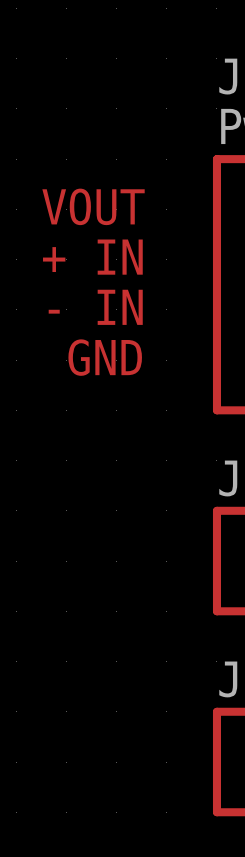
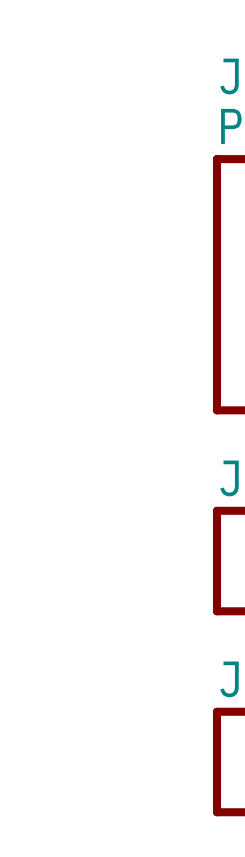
text: VOUT (93, 206) -> none
text: + IN (92, 257) -> none
text: - IN (95, 307) -> none
text: GND (105, 357) -> none

